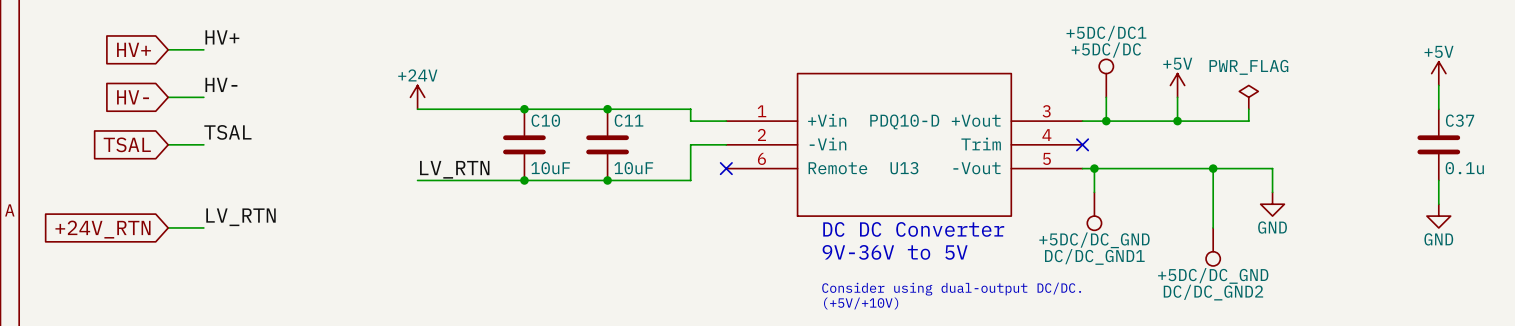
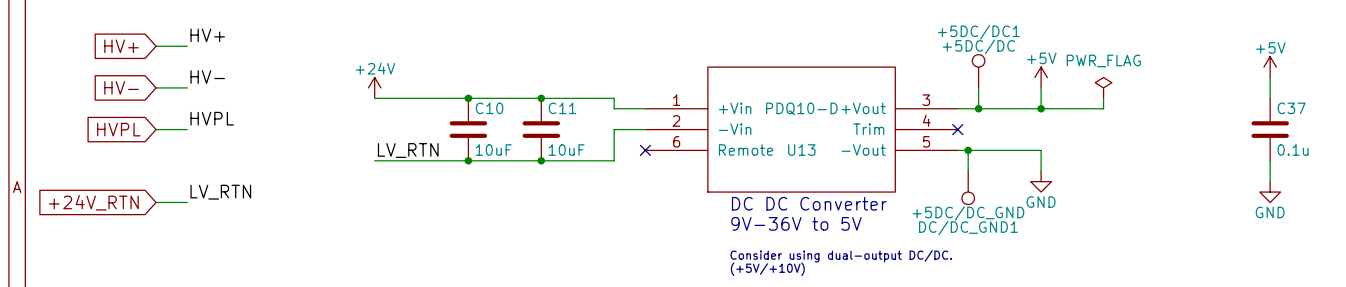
label: TSAL (227, 132) -> HVPL (212, 118)
global label: TSAL (127, 144) -> HVPL (118, 129)
wire: (1177, 168) (1272, 168) (1272, 192) -> (1041, 150) (1041, 171)
wire: (1213, 168) (1213, 227) -> none
junction: (1213, 168) -> none
power symbol position: GND (1272, 204) -> GND (1041, 181)
DC/DC_GND2: +5DC/DC_GND (1213, 246) -> none

